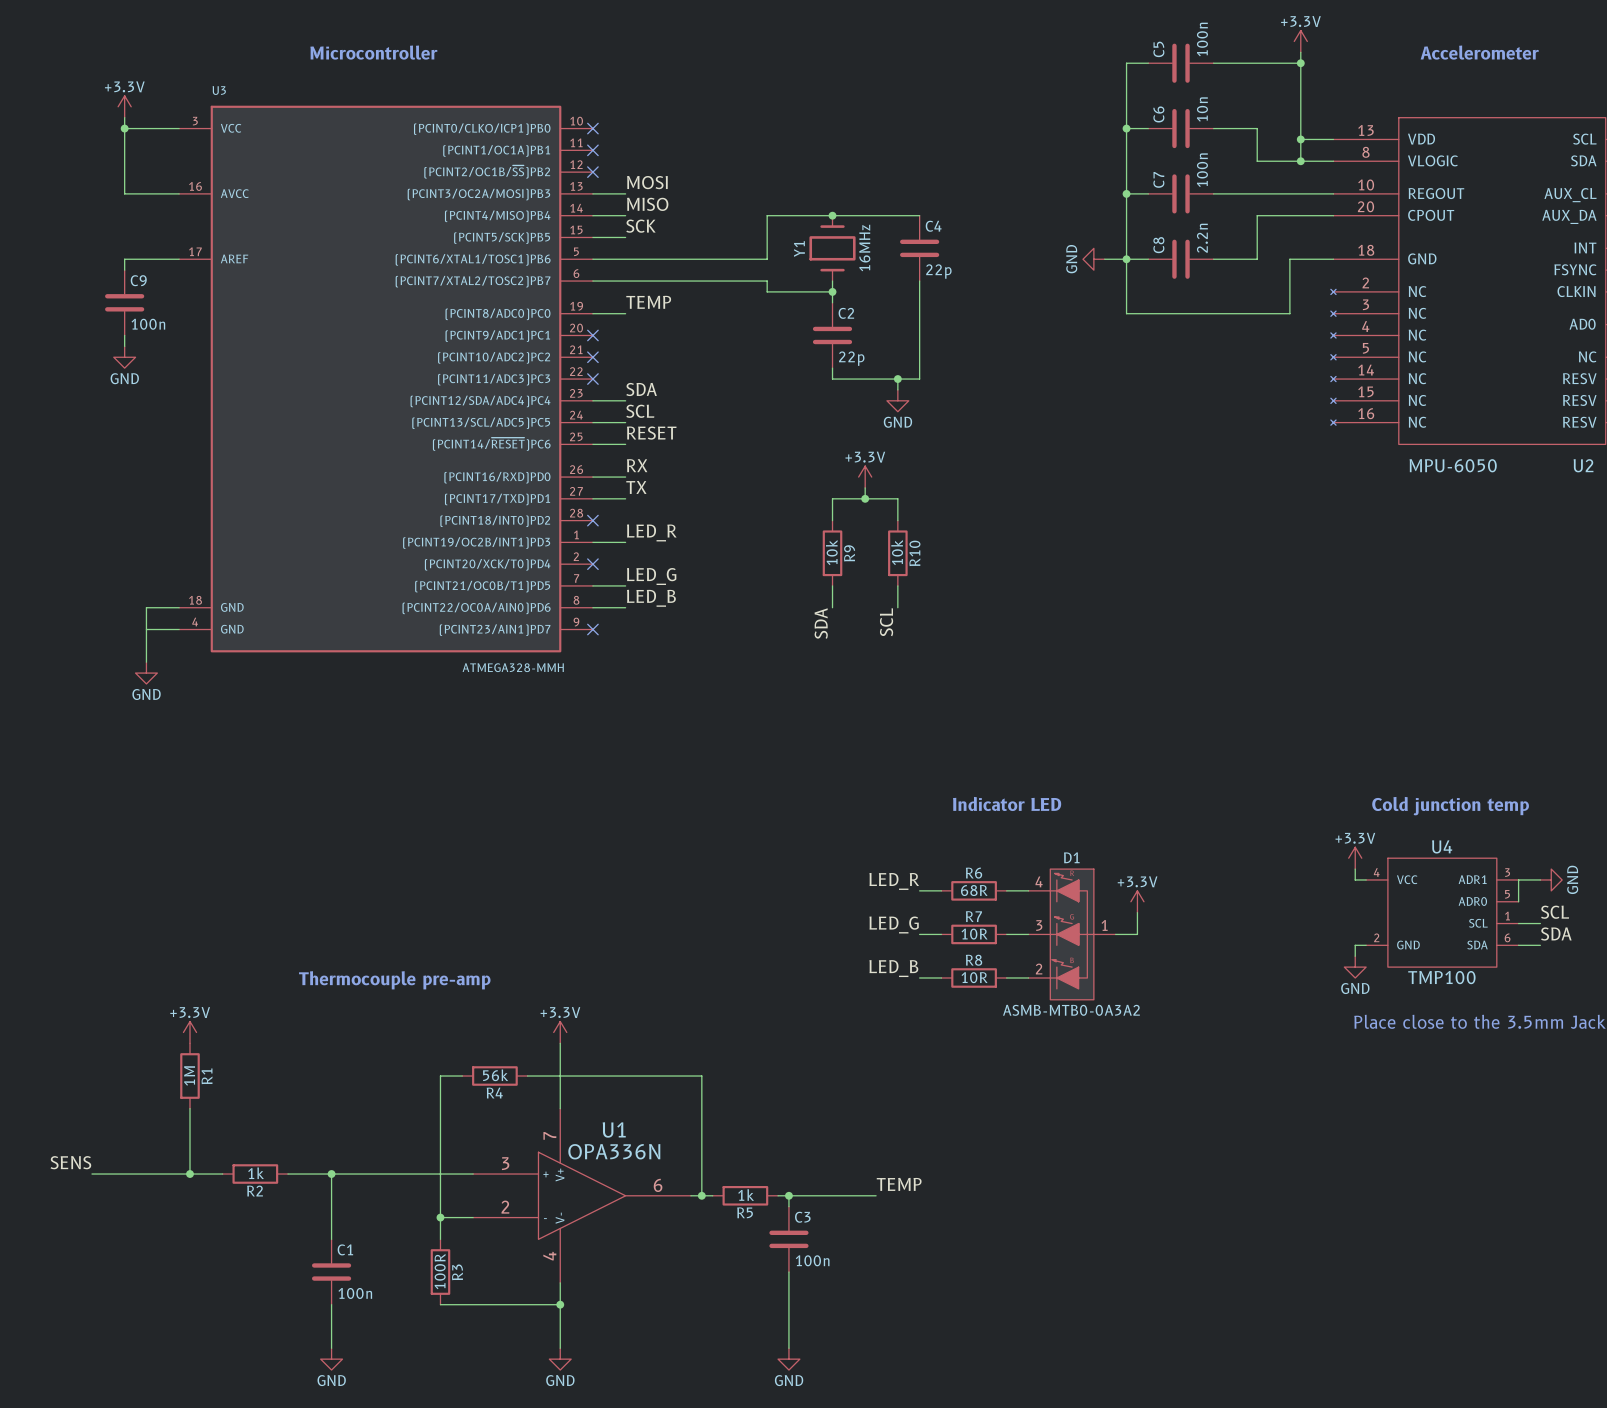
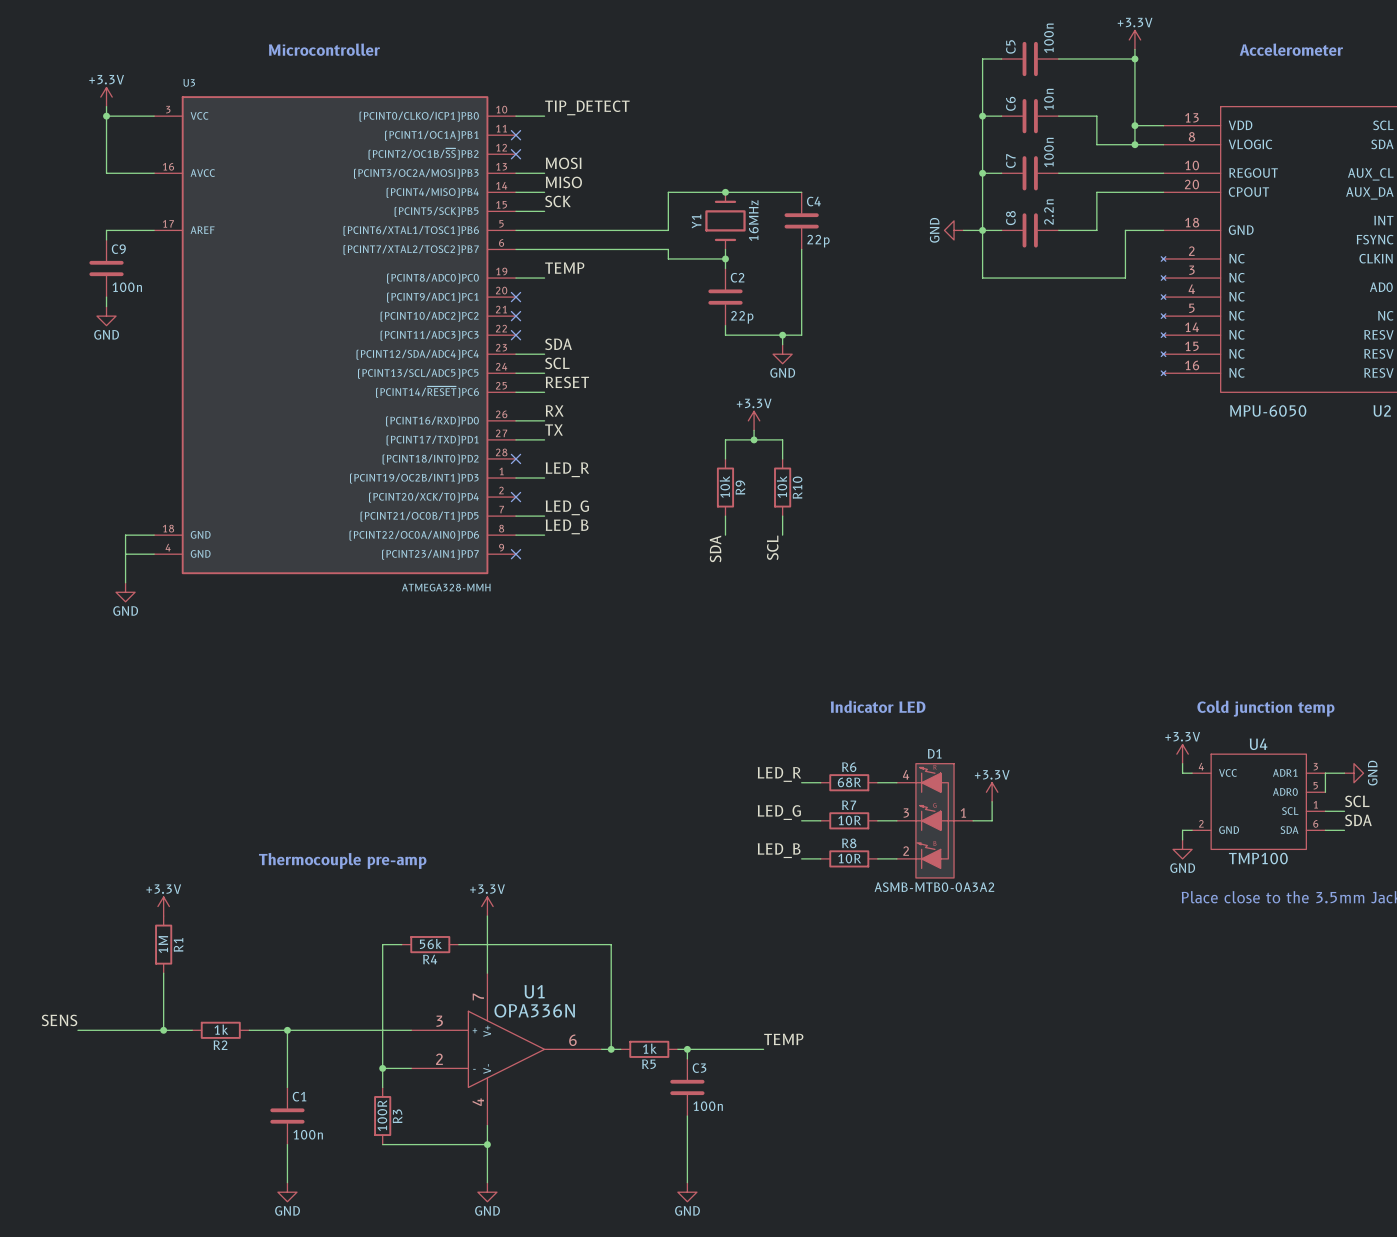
label: none -> TIP_DETECT (587, 107)
wire: none -> (515, 116) (544, 116)
no-connect mark: (592, 128) -> none

